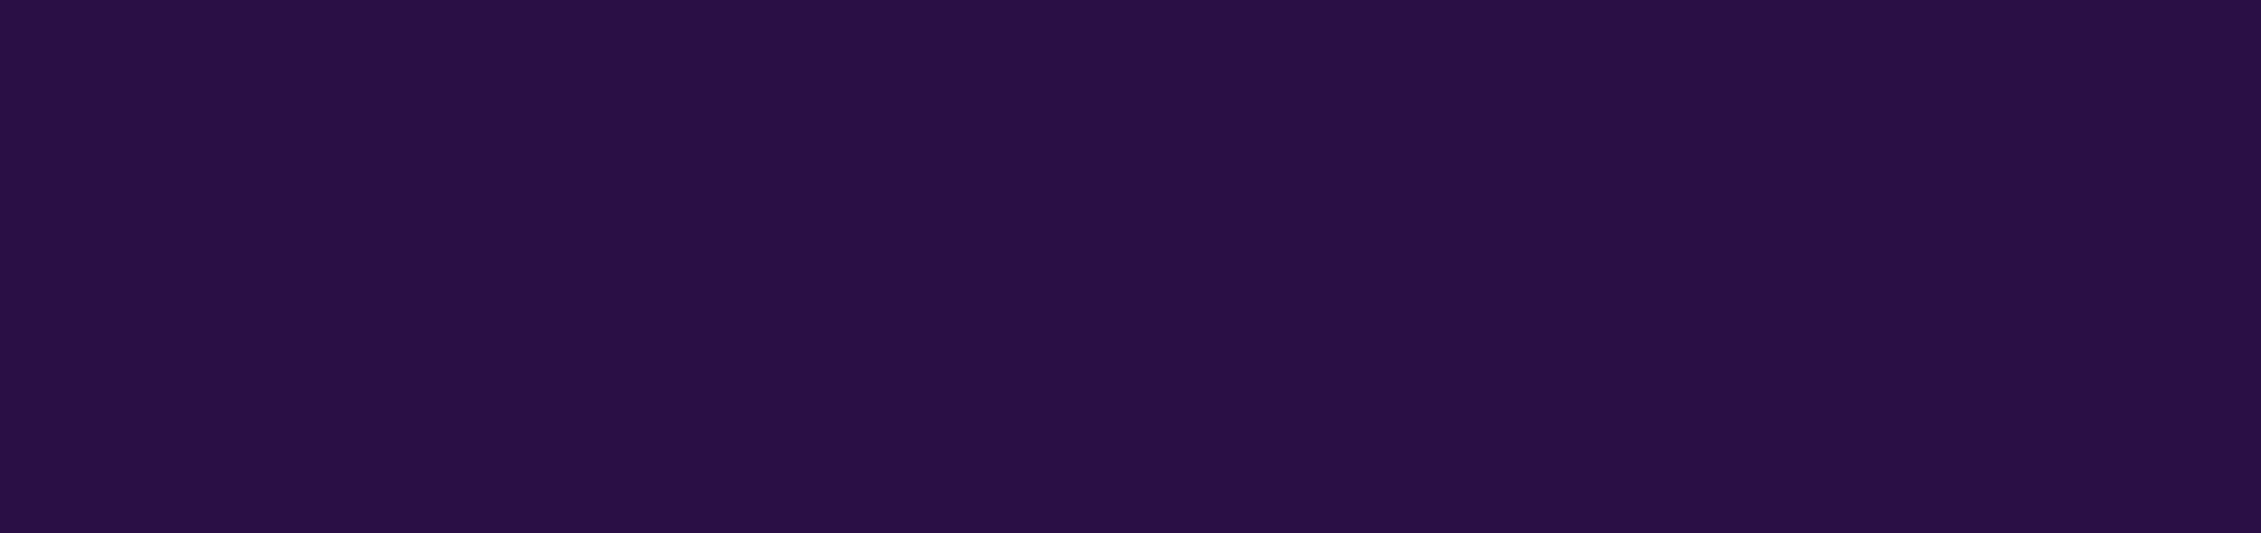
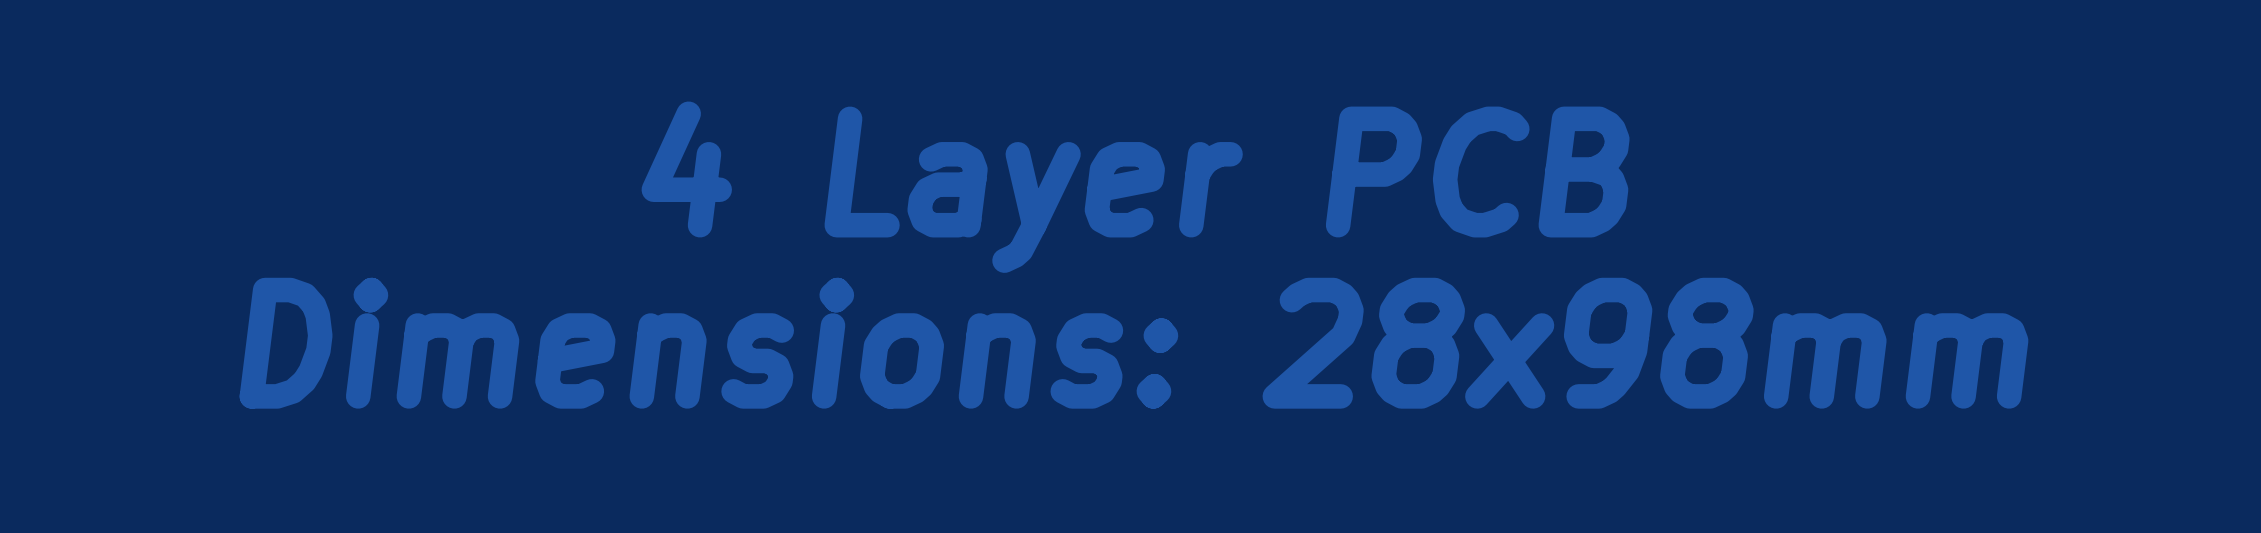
text: none -> 4 Layer PCB (1135, 187)
text: none -> Dimensions: 28x98mm (1133, 343)

